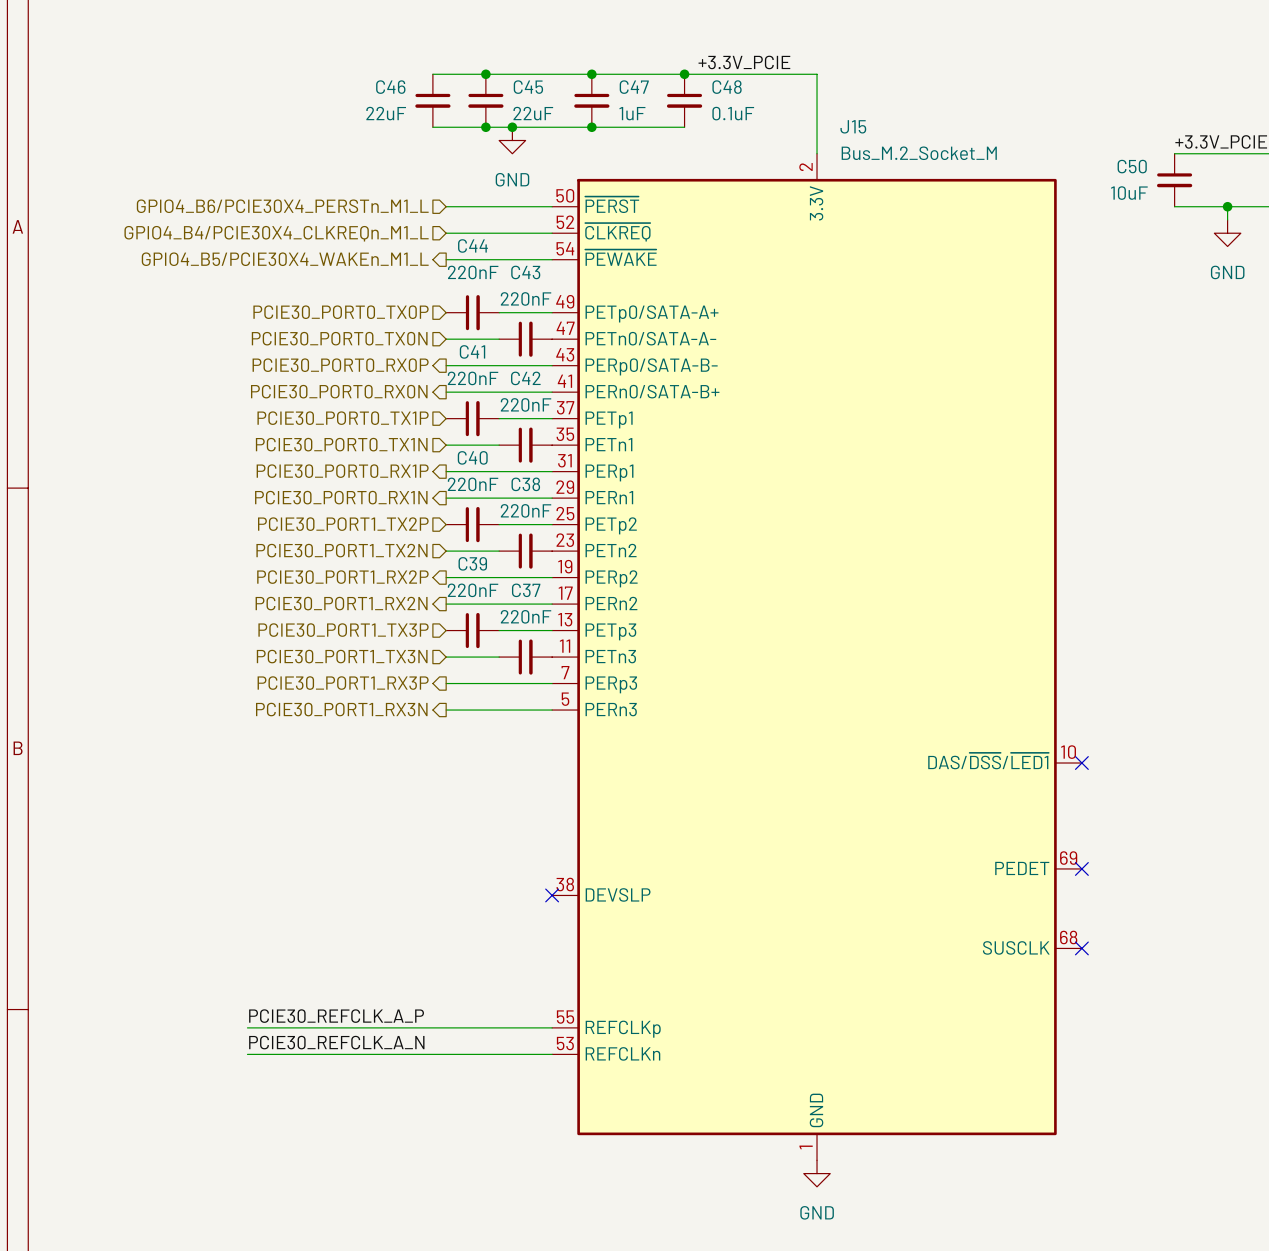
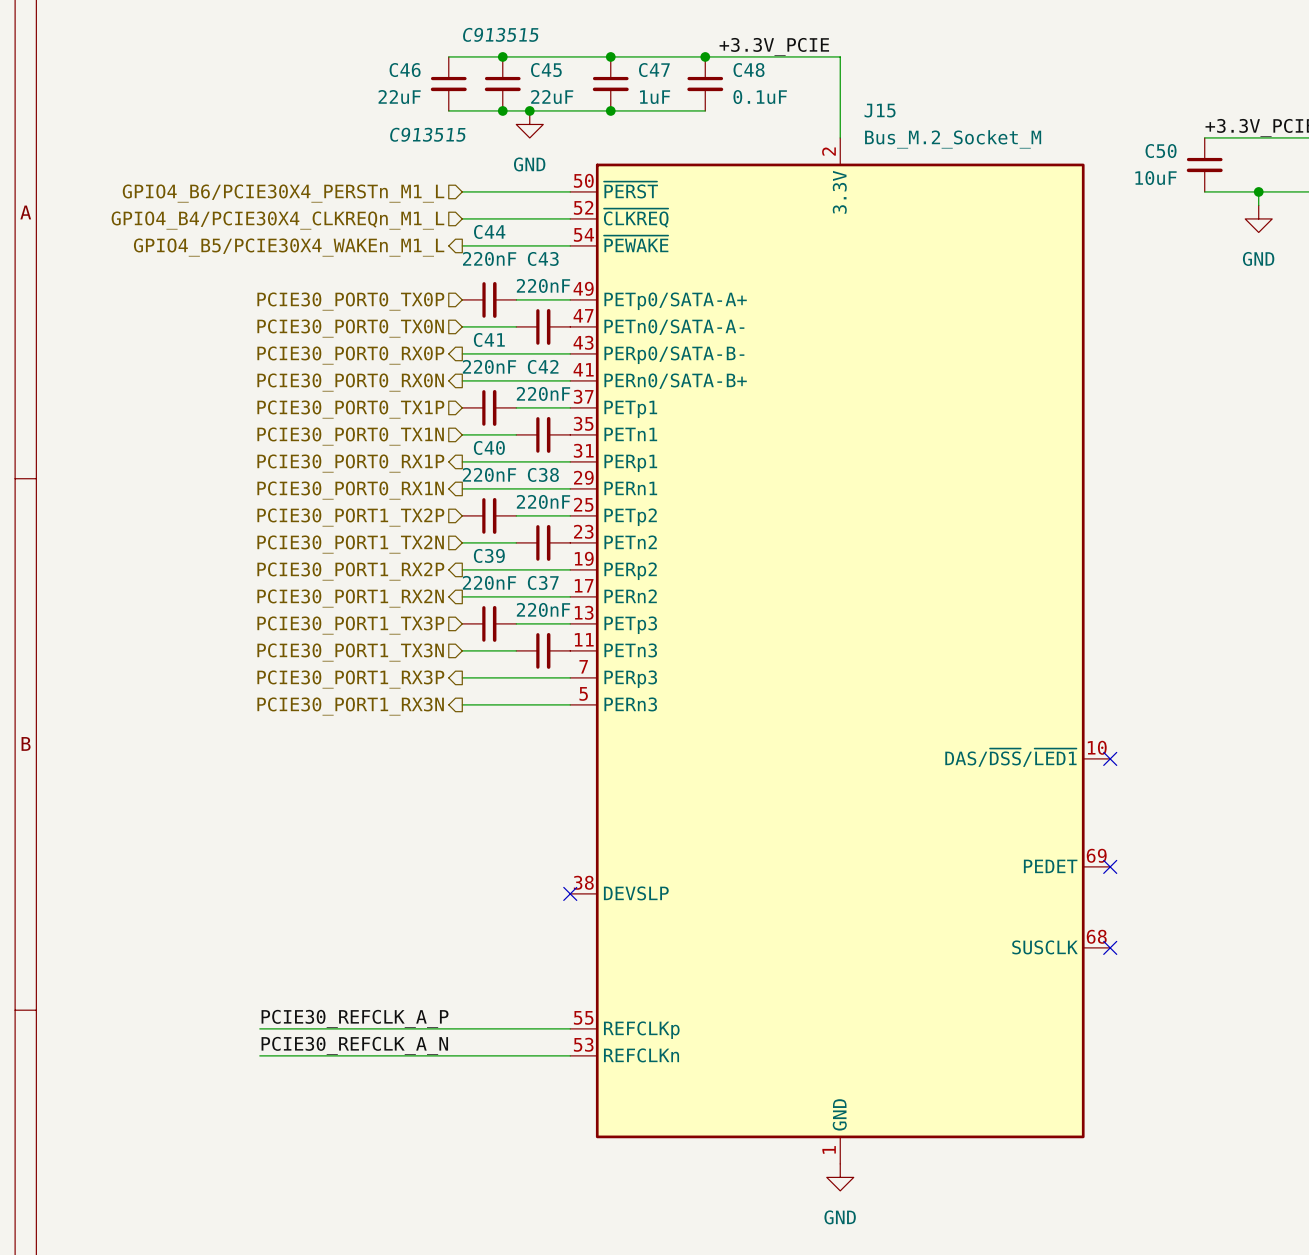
C45 text: none -> C913515 (500, 34)
C46 text: none -> C913515 (427, 134)

